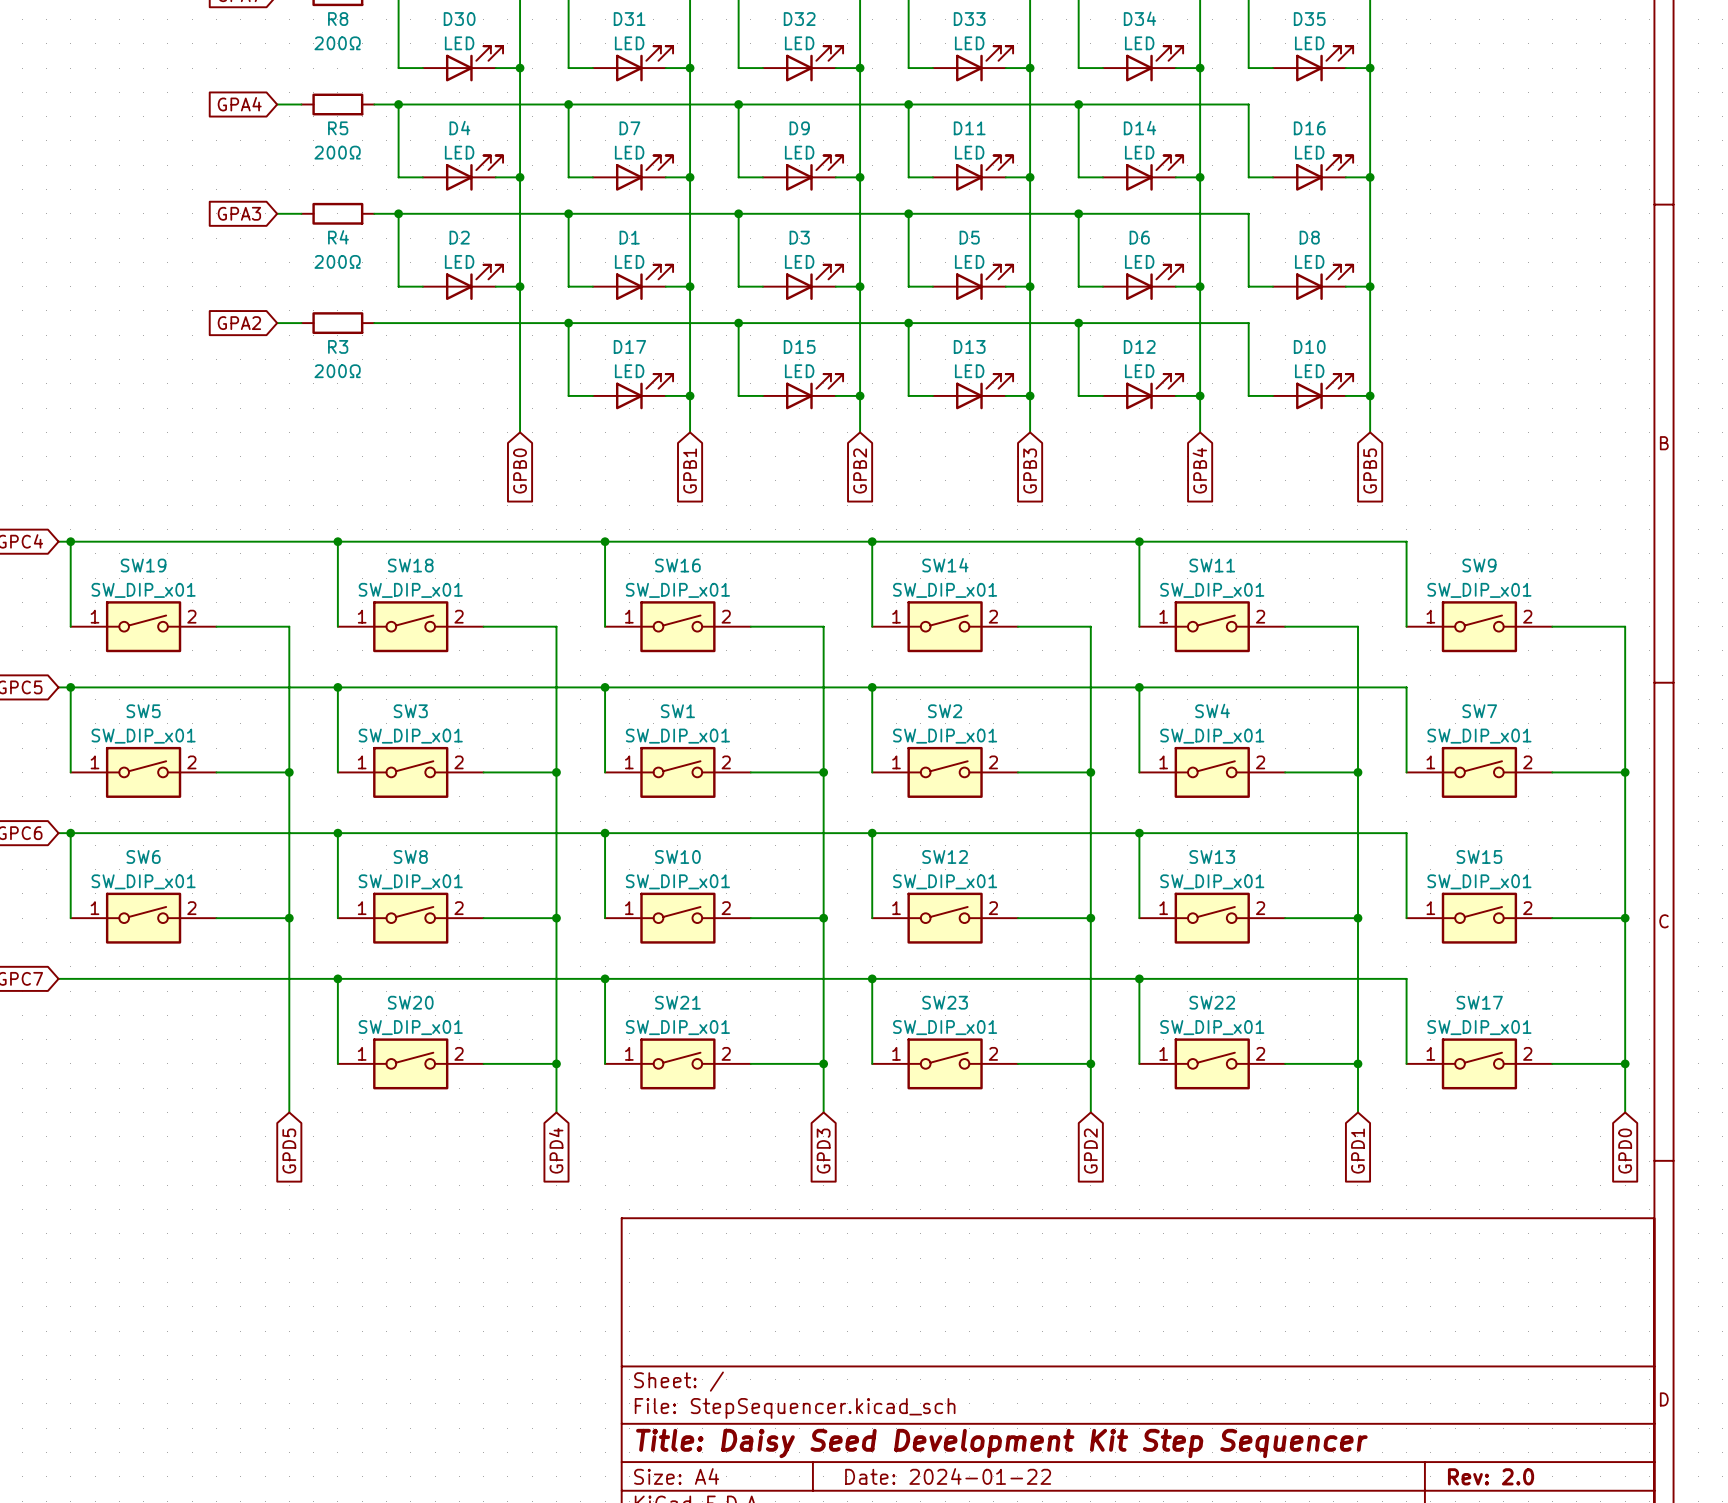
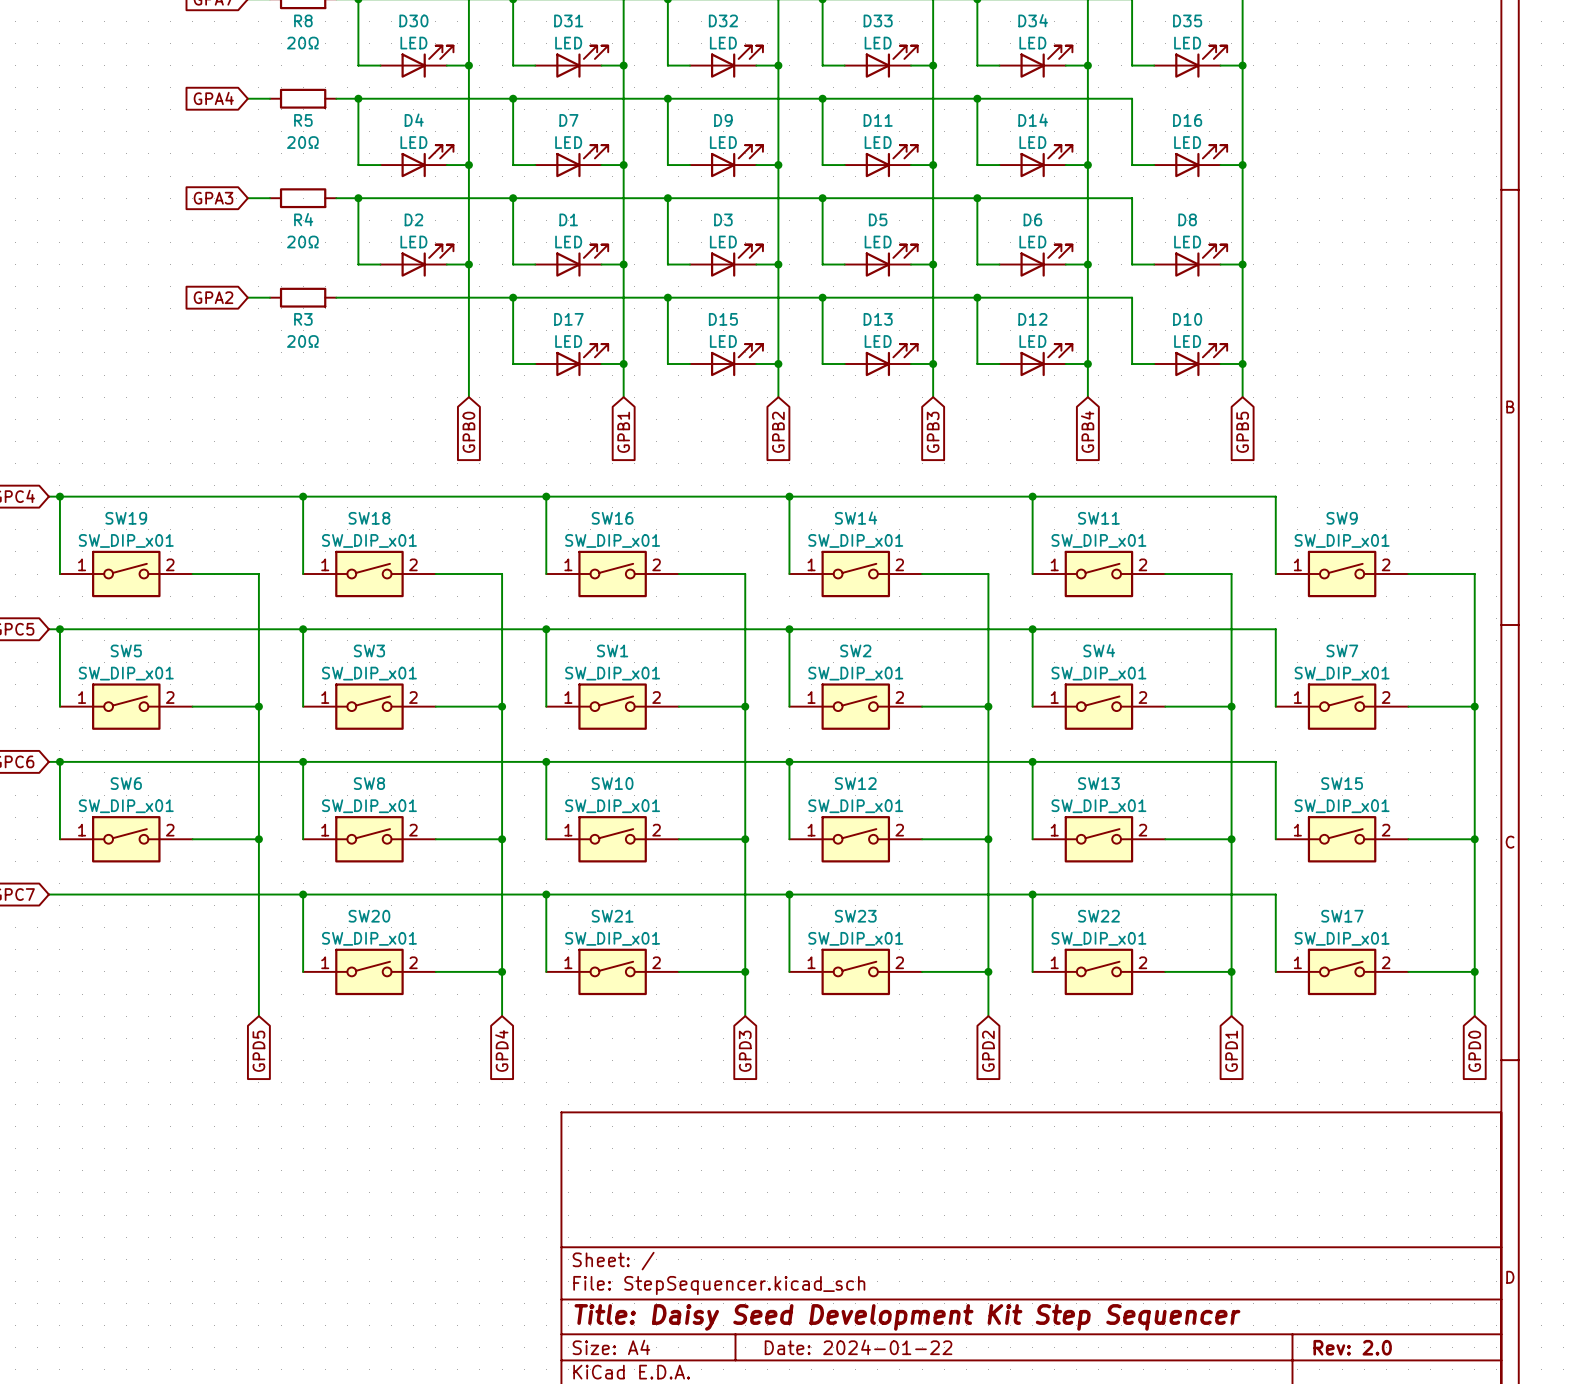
R8 value: 200Ω (337, 43) -> 20Ω (302, 43)
R5 value: 200Ω (337, 152) -> 20Ω (302, 142)
R4 value: 200Ω (337, 261) -> 20Ω (302, 242)
R3 value: 200Ω (337, 371) -> 20Ω (302, 341)

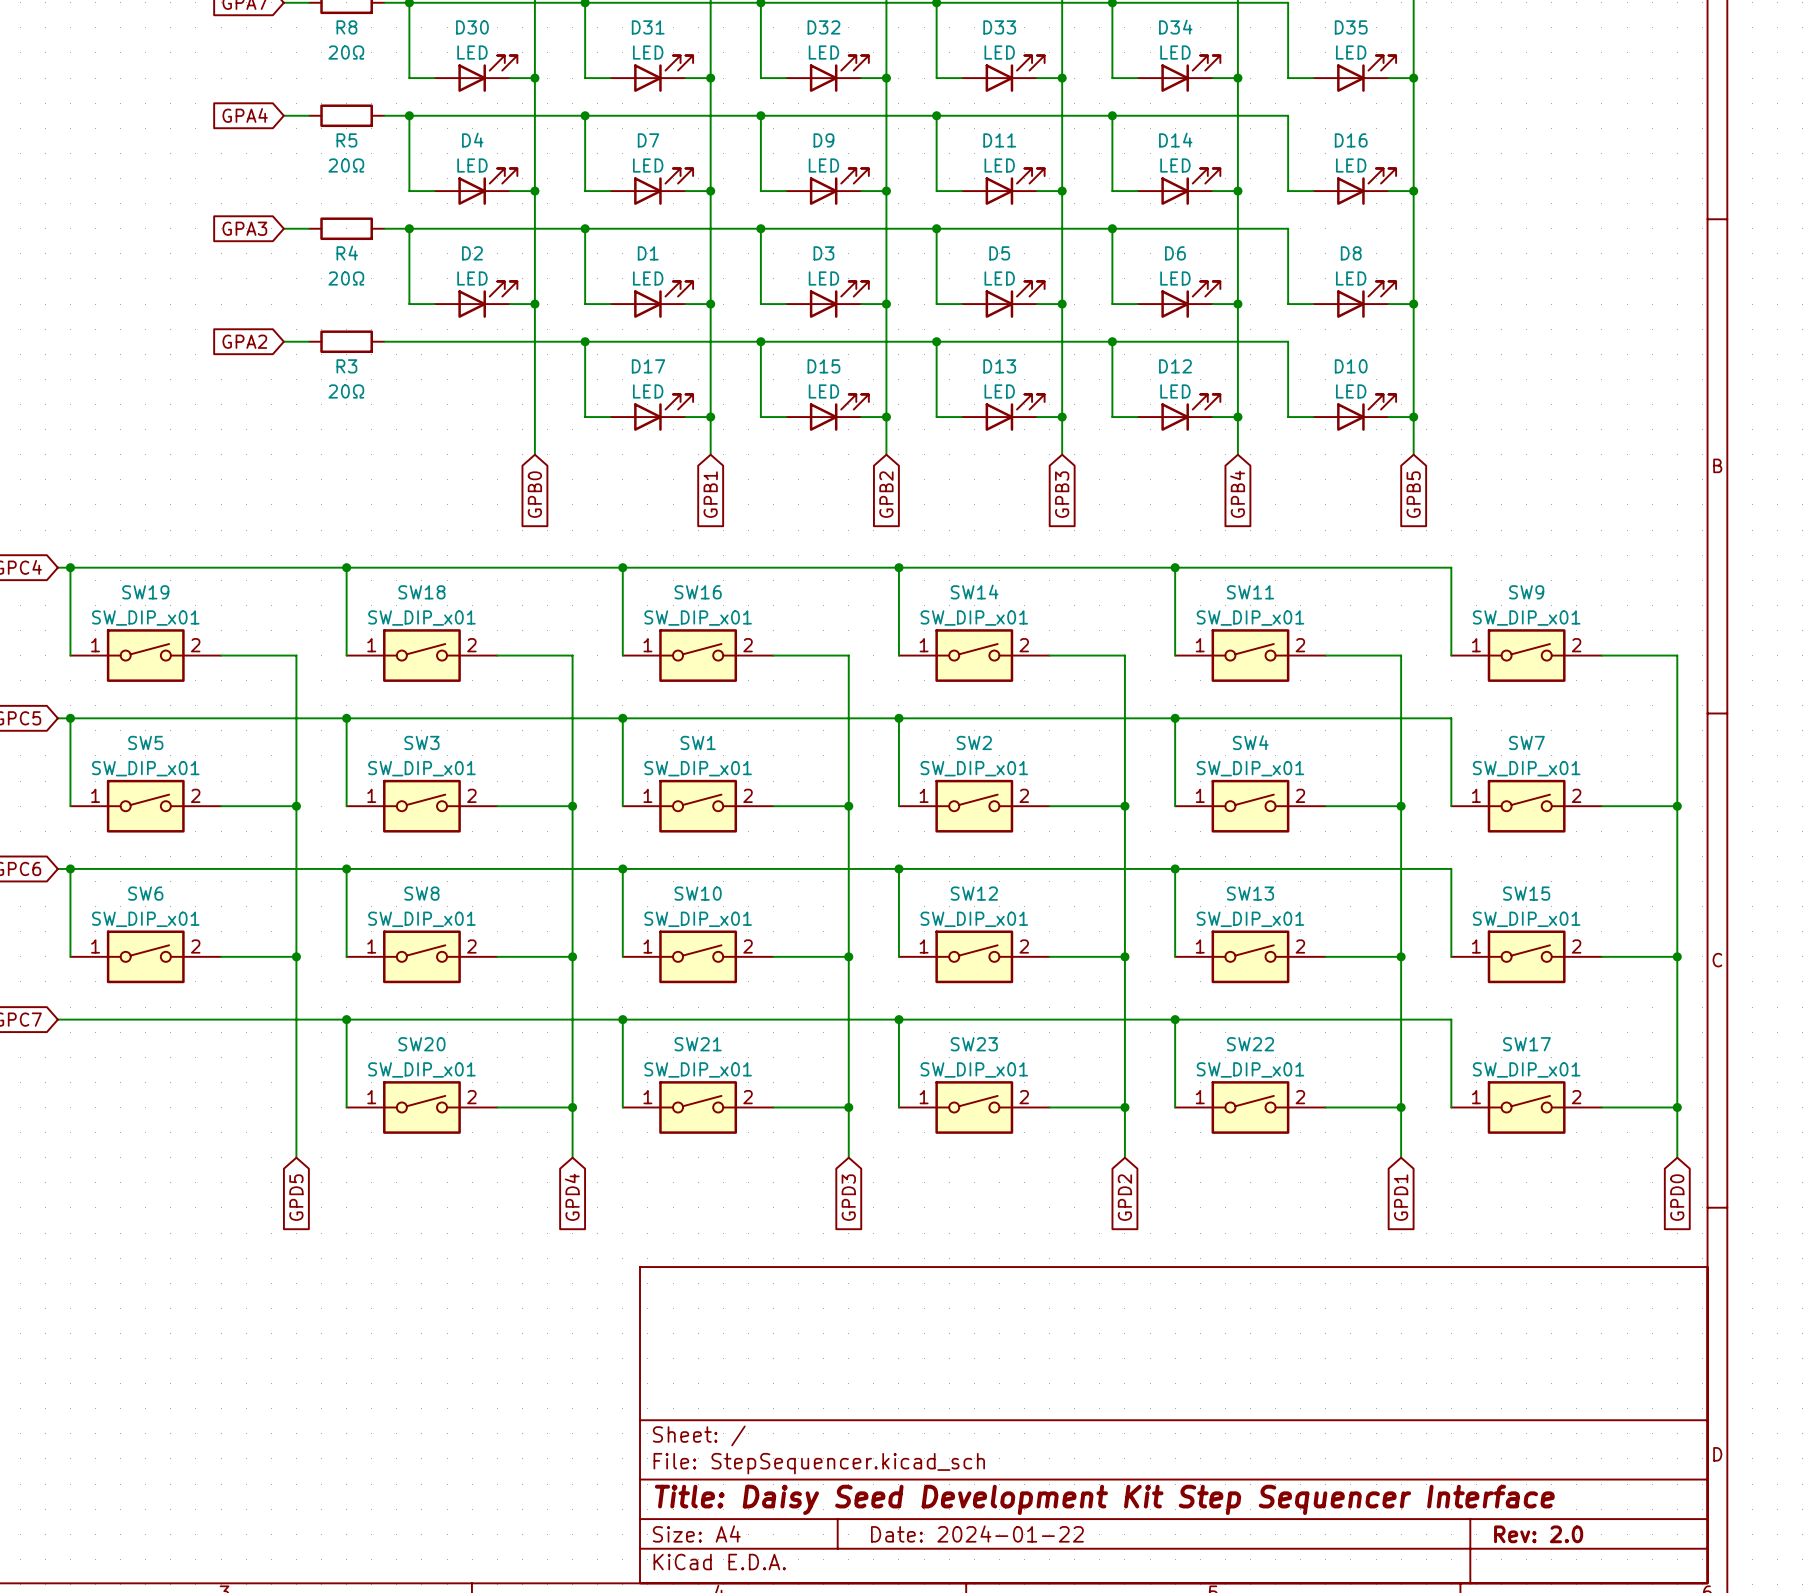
title block: Title: Daisy Seed Development Kit Step Sequencer (907, 1317) -> Title: Daisy Seed Development Kit Step Sequencer Interface (1104, 1499)

